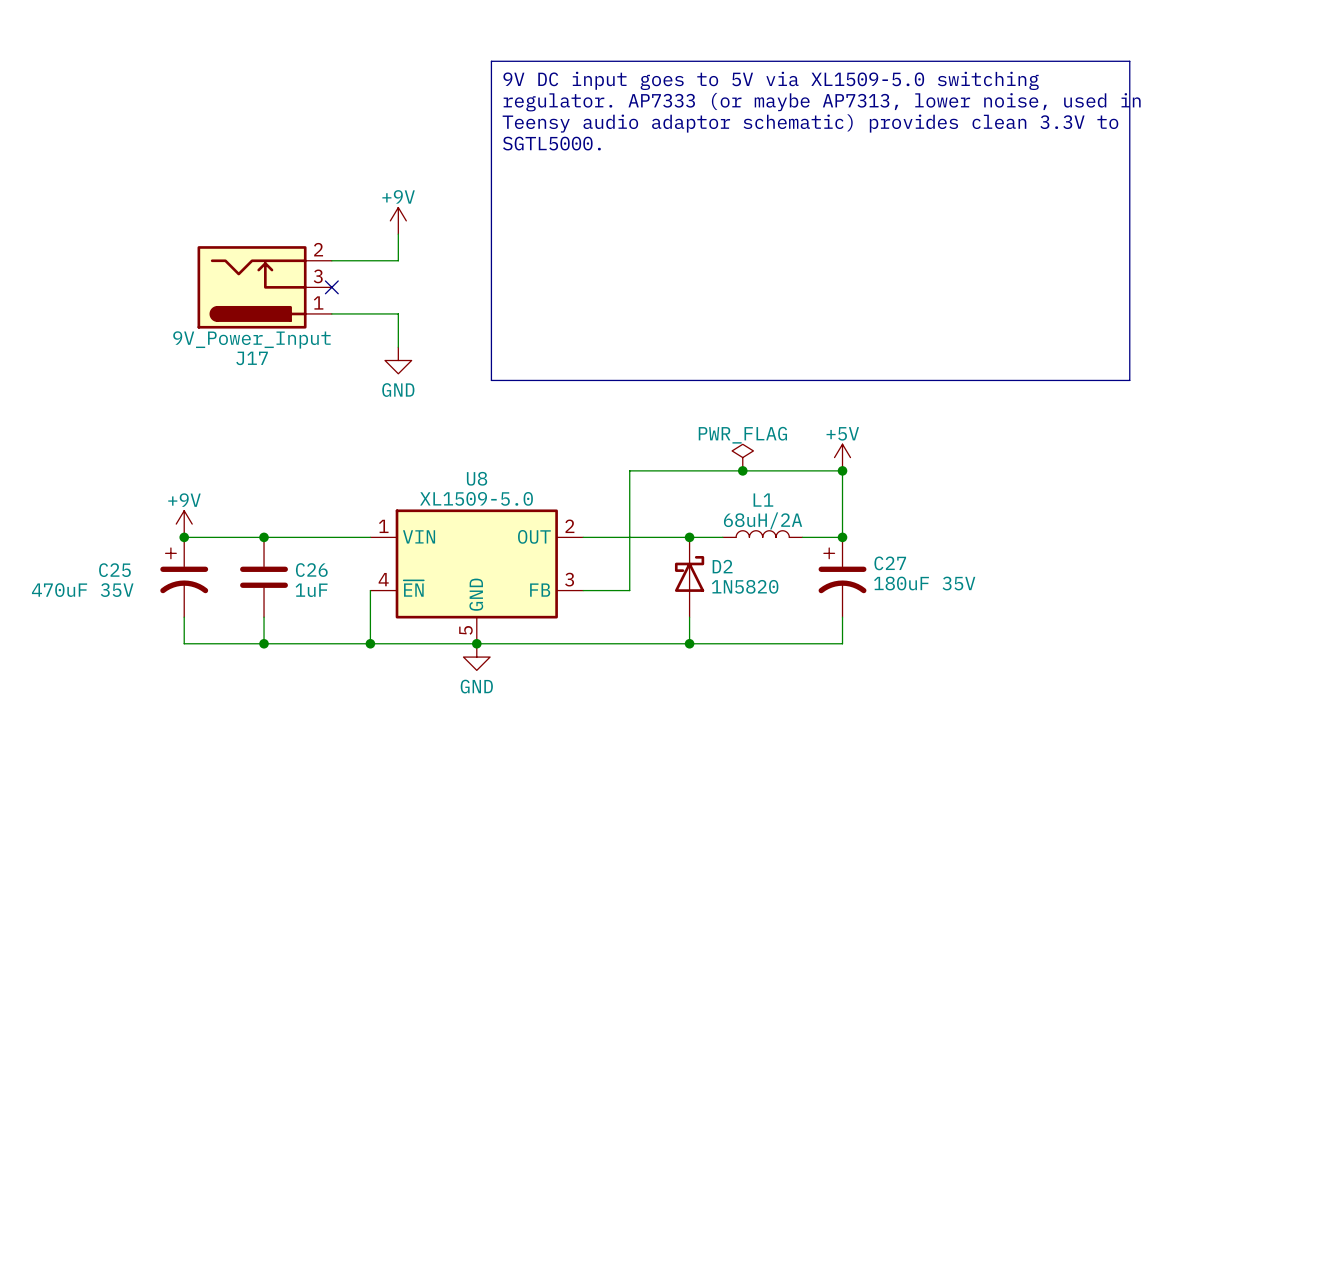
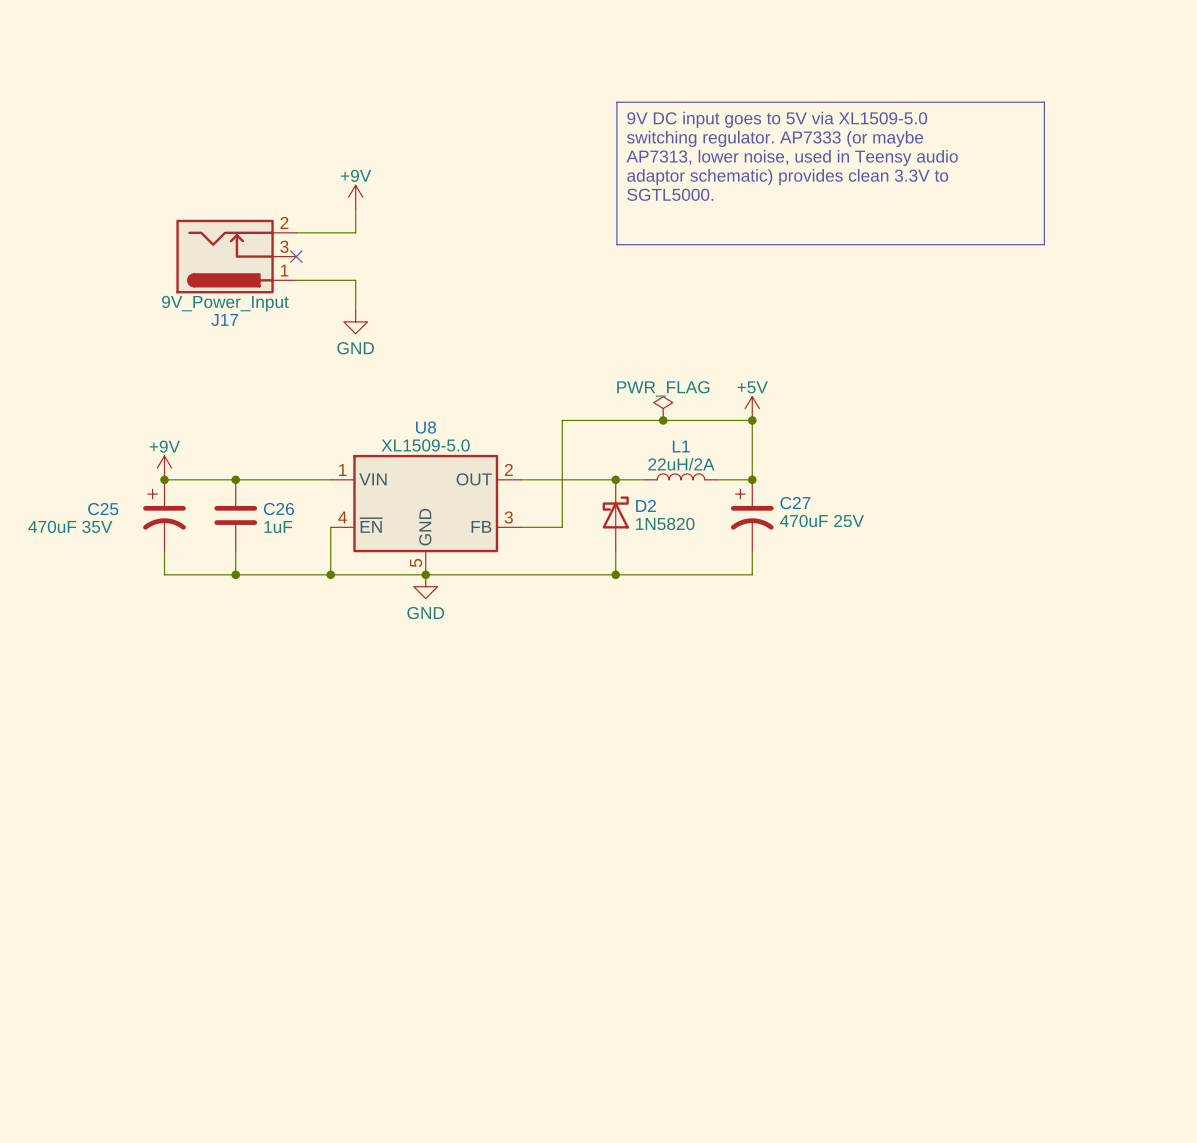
line: (491, 61) (1129, 61) (1129, 380) (491, 380) (491, 61) -> none
text: 9V DC input goes to 5V via XL1509-5.0 switching (771, 80) -> none
text: regulator. AP7333 (or maybe AP7313, lower noise, used in (822, 102) -> none
line: none -> (616, 102) (1044, 102) (1044, 244) (616, 244) (616, 102)
text: Teensy audio adaptor schematic) provides clean 3.3V to (810, 123) -> none
text: none -> 9V DC input goes to 5V via XL1509-5.0 (777, 119)
text position: SGTL5000. (551, 143) -> SGTL5000. (670, 194)
text: none -> switching regulator. AP7333 (or maybe (775, 138)
text: none -> AP7313, lower noise, used in Teensy audio (792, 158)
text: none -> adaptor schematic) provides clean 3.3V to (787, 177)
L1 value: 68uH/2A (763, 520) -> 22uH/2A (681, 464)
C27 value: 180uF 35V (924, 583) -> 470uF 25V (821, 521)

